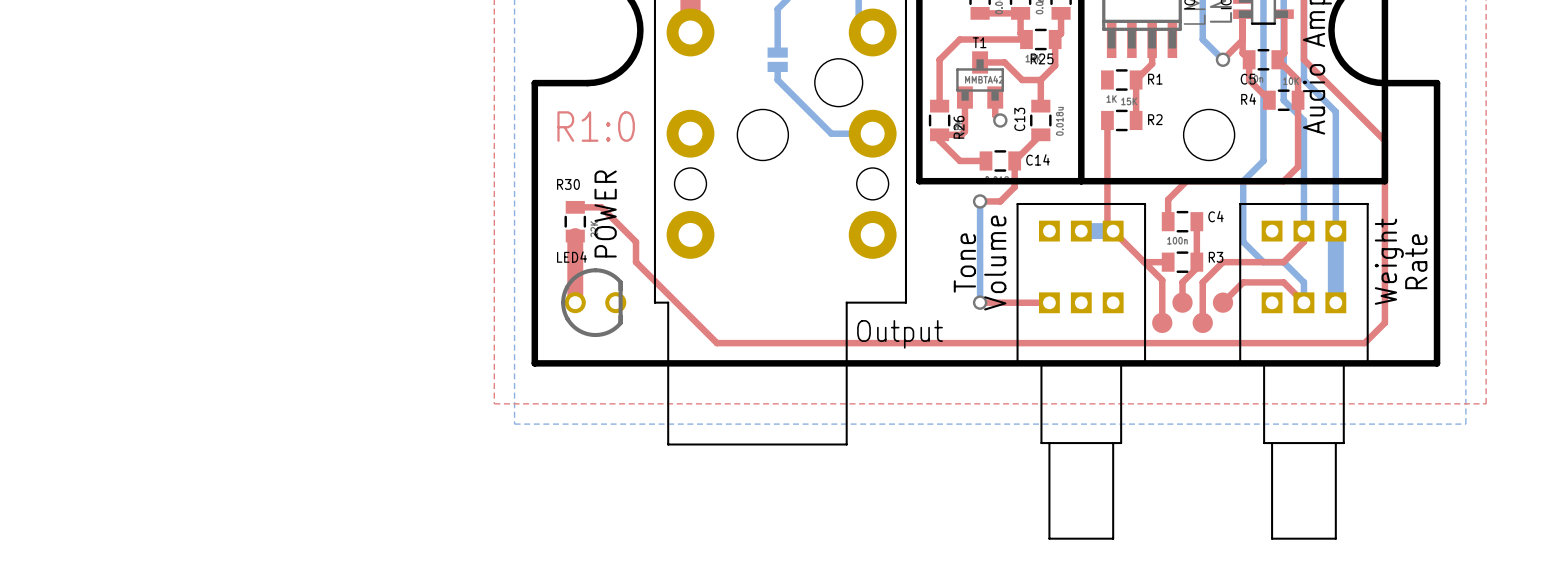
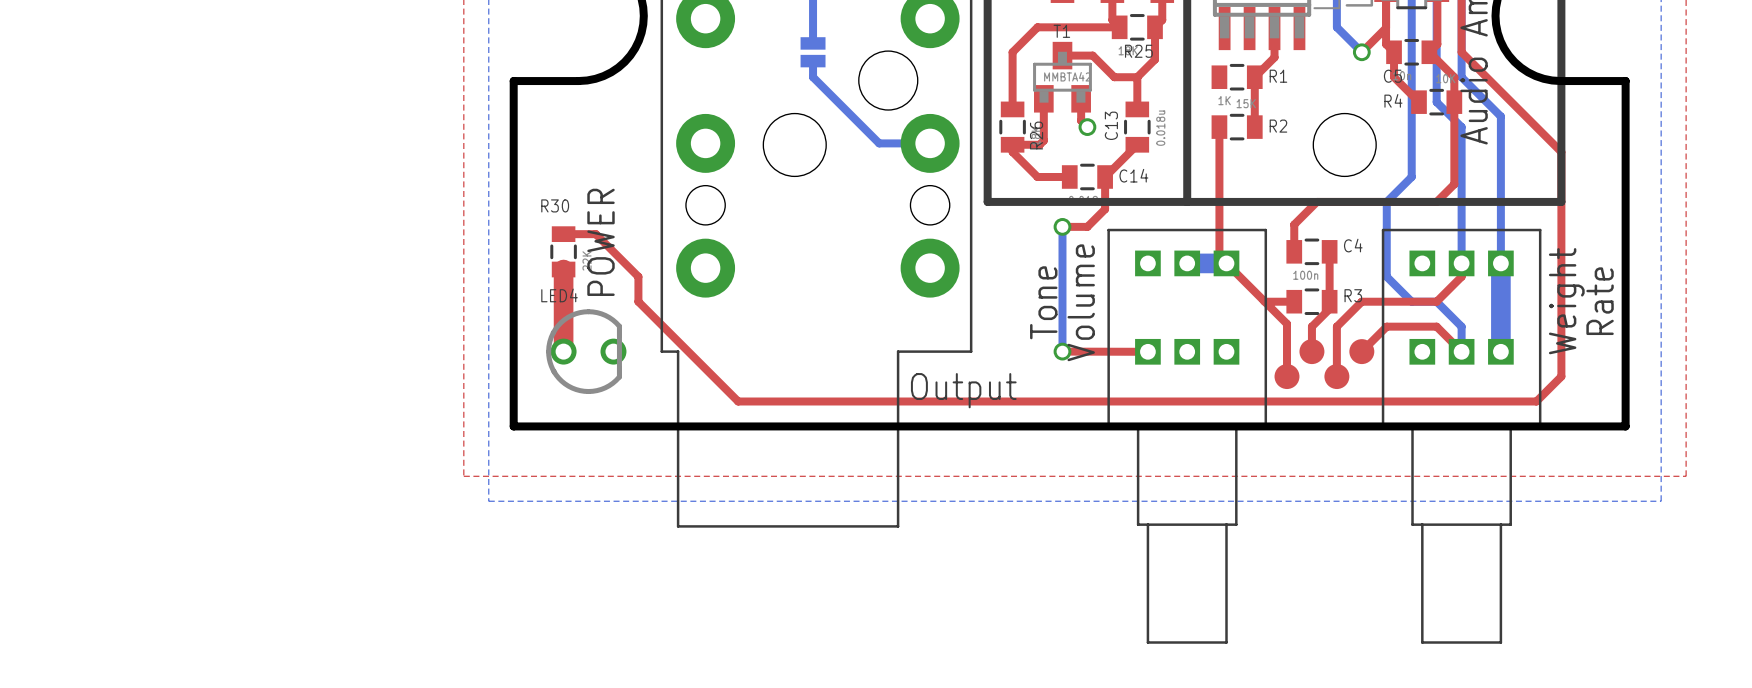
text: R1:0 (596, 126) -> none

